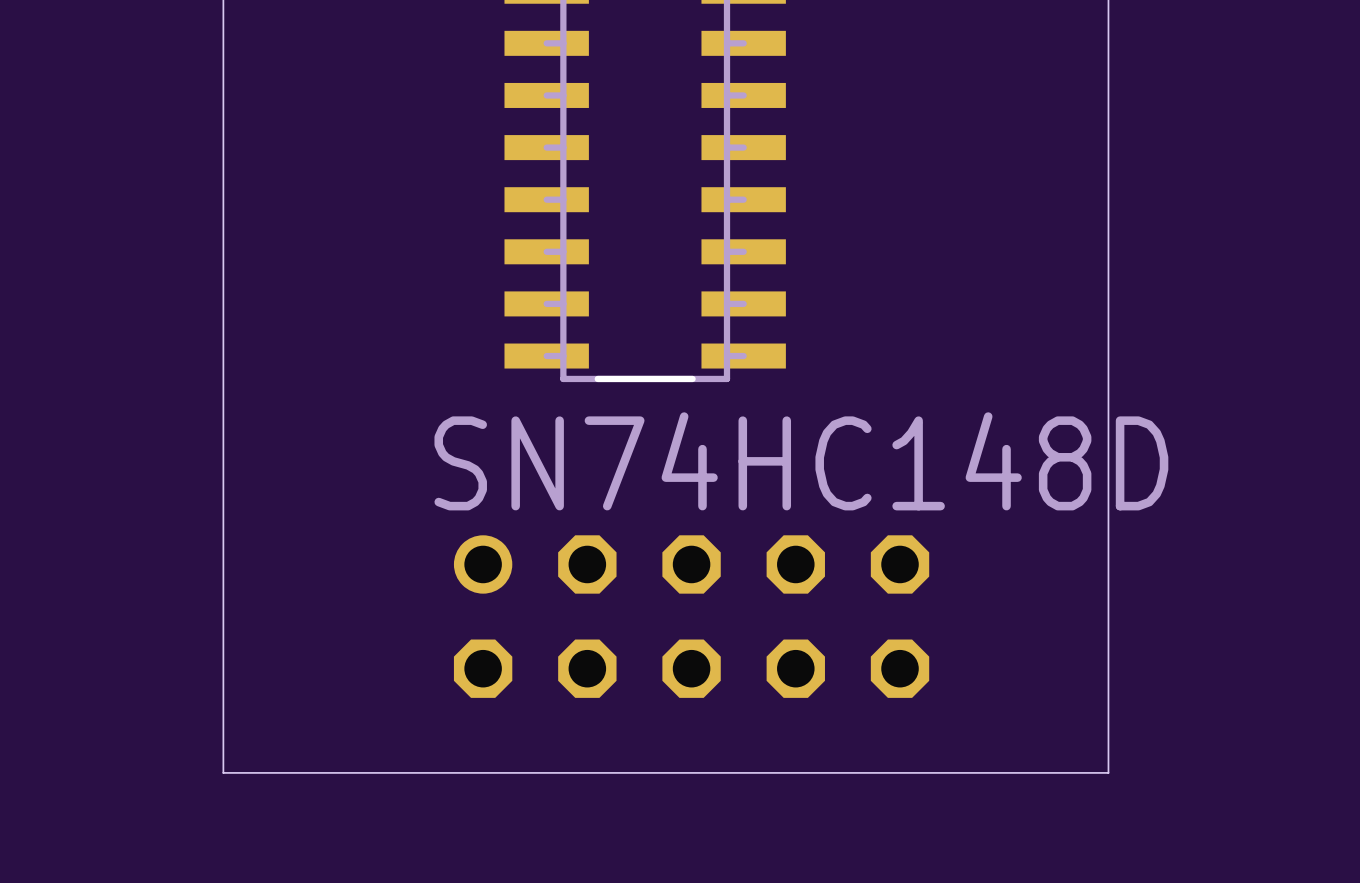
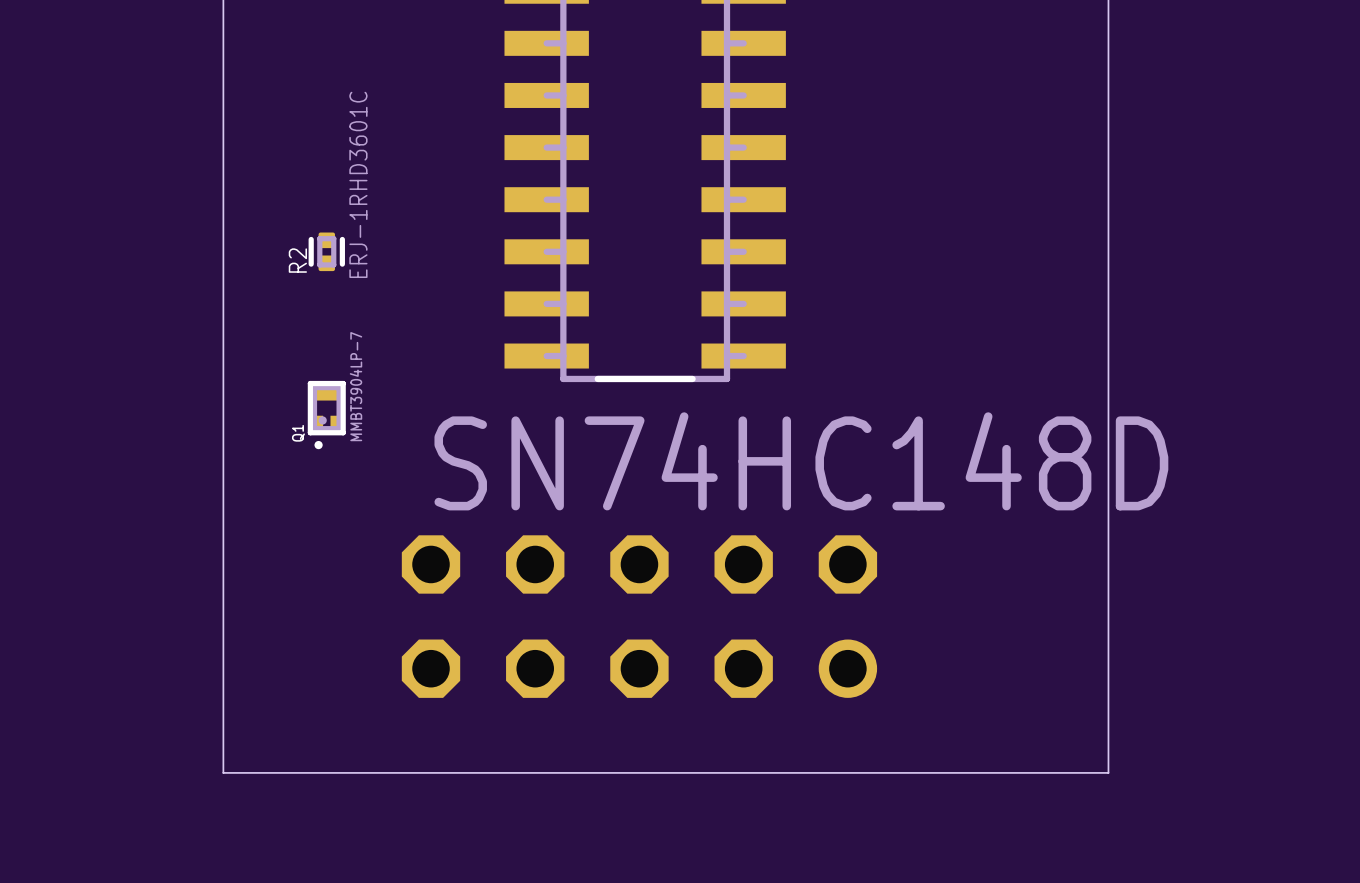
R2: none -> ERJ-1RHD3601C (326, 251)
Q1: none -> MMBT3904LP-7 (326, 415)
part rotation: 0° (691, 616) -> 180° (639, 616)

